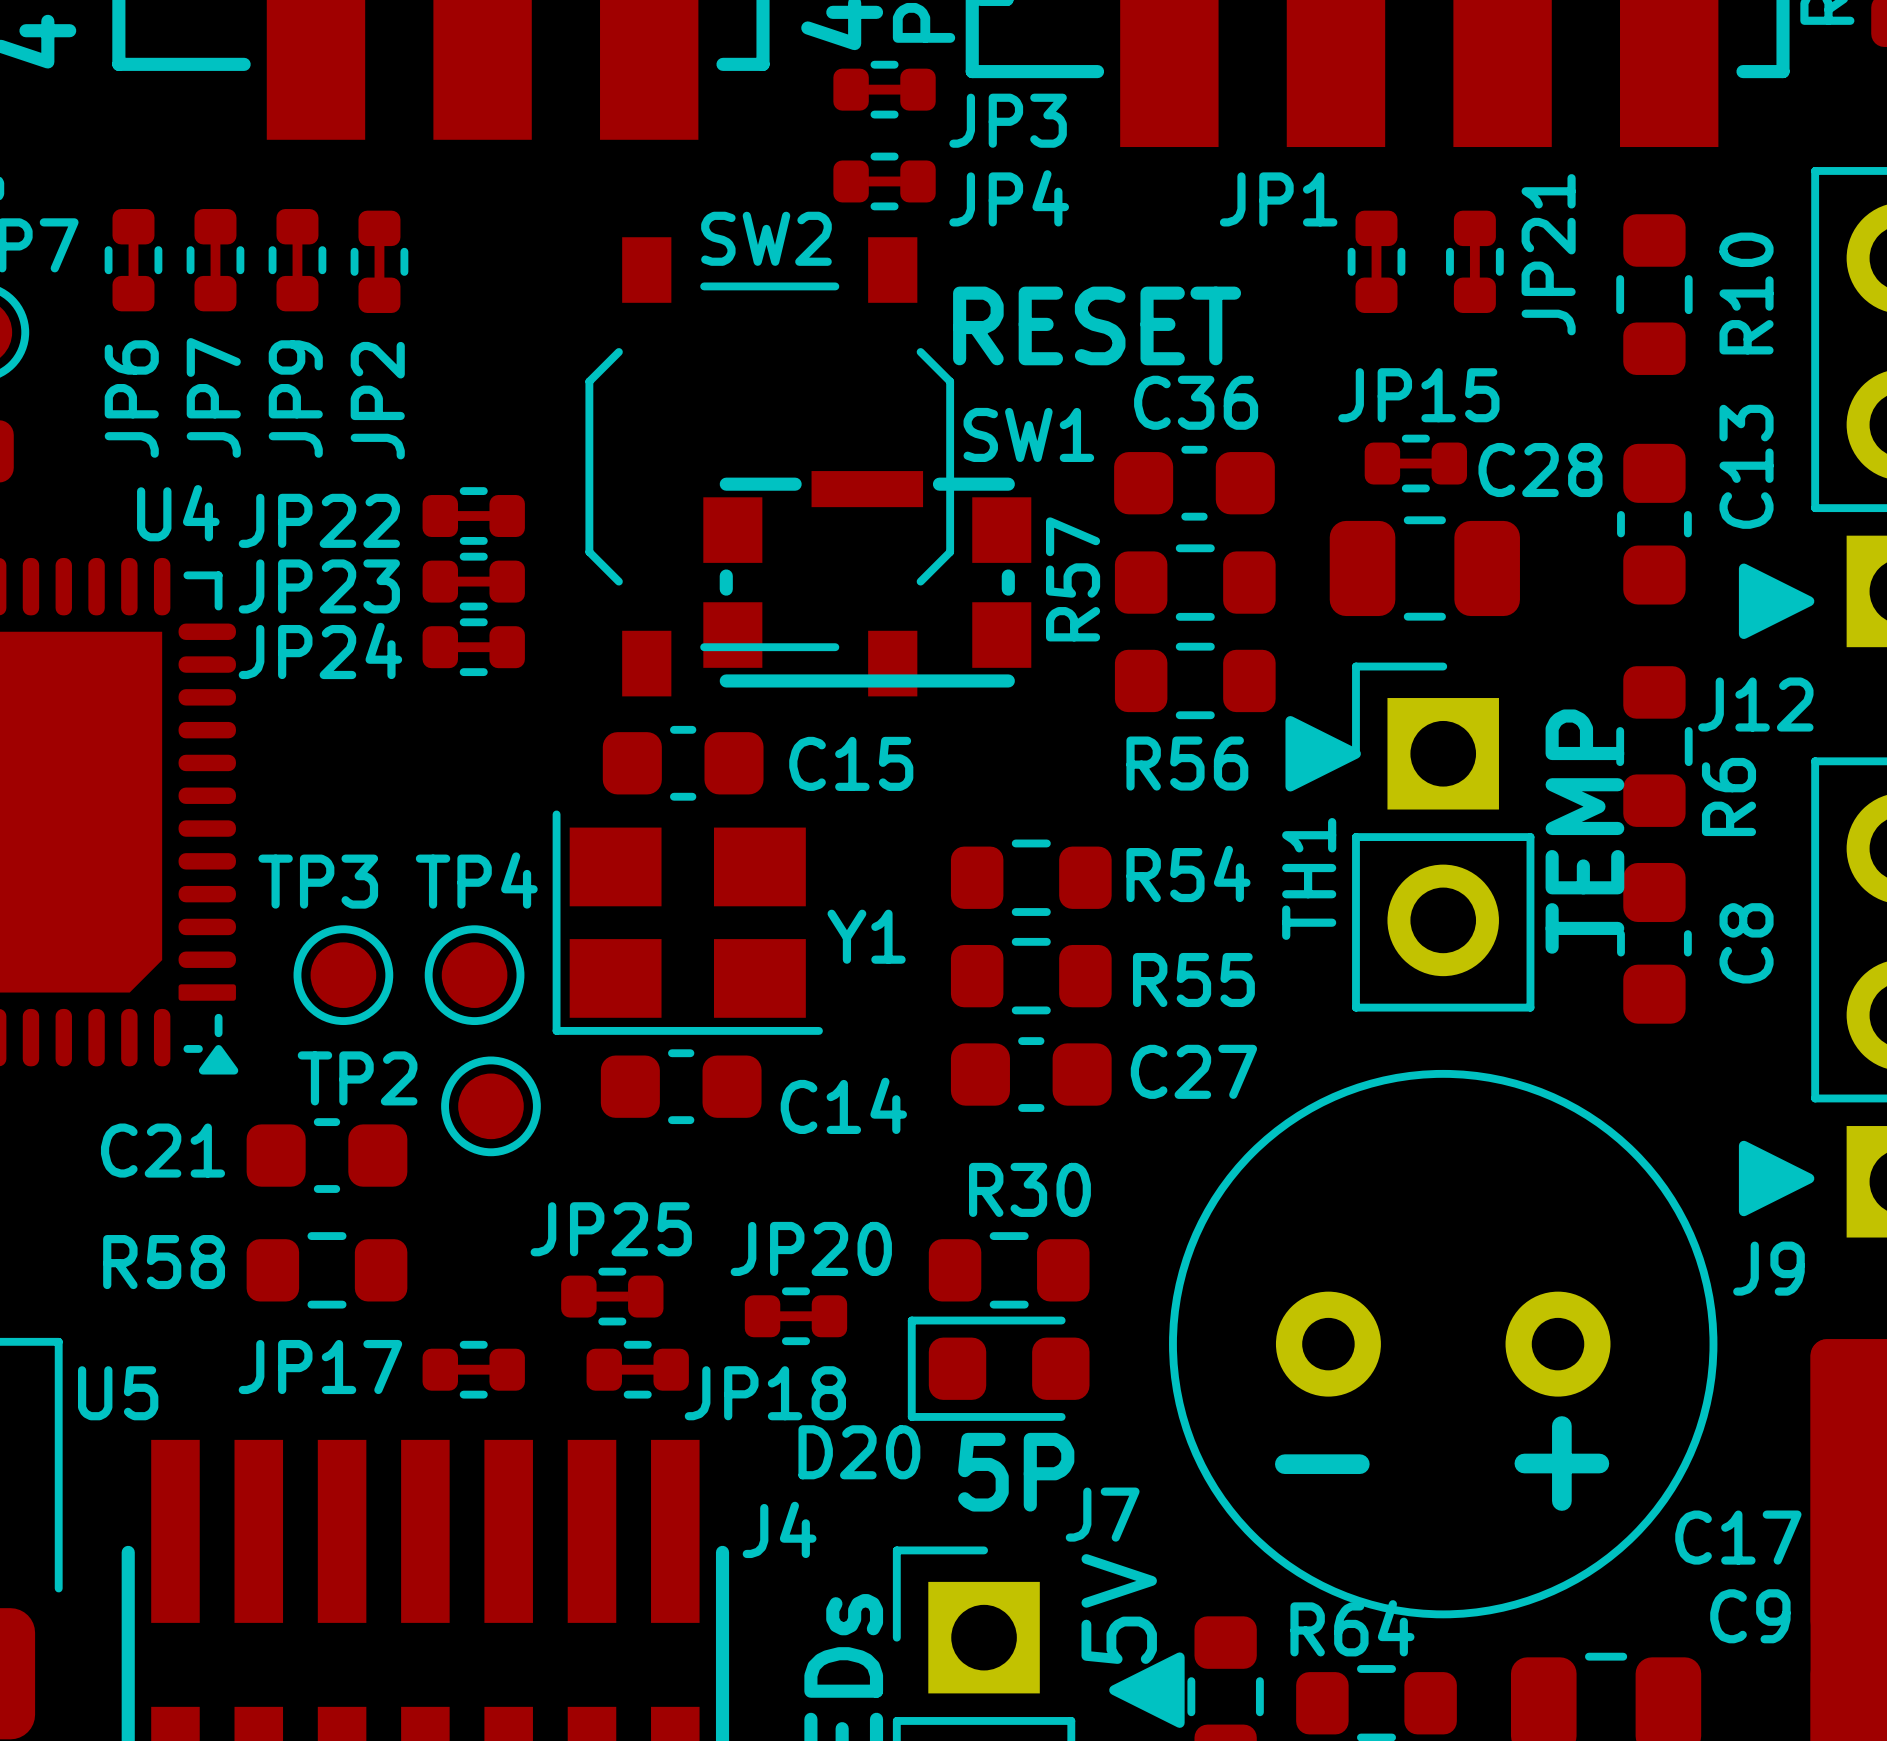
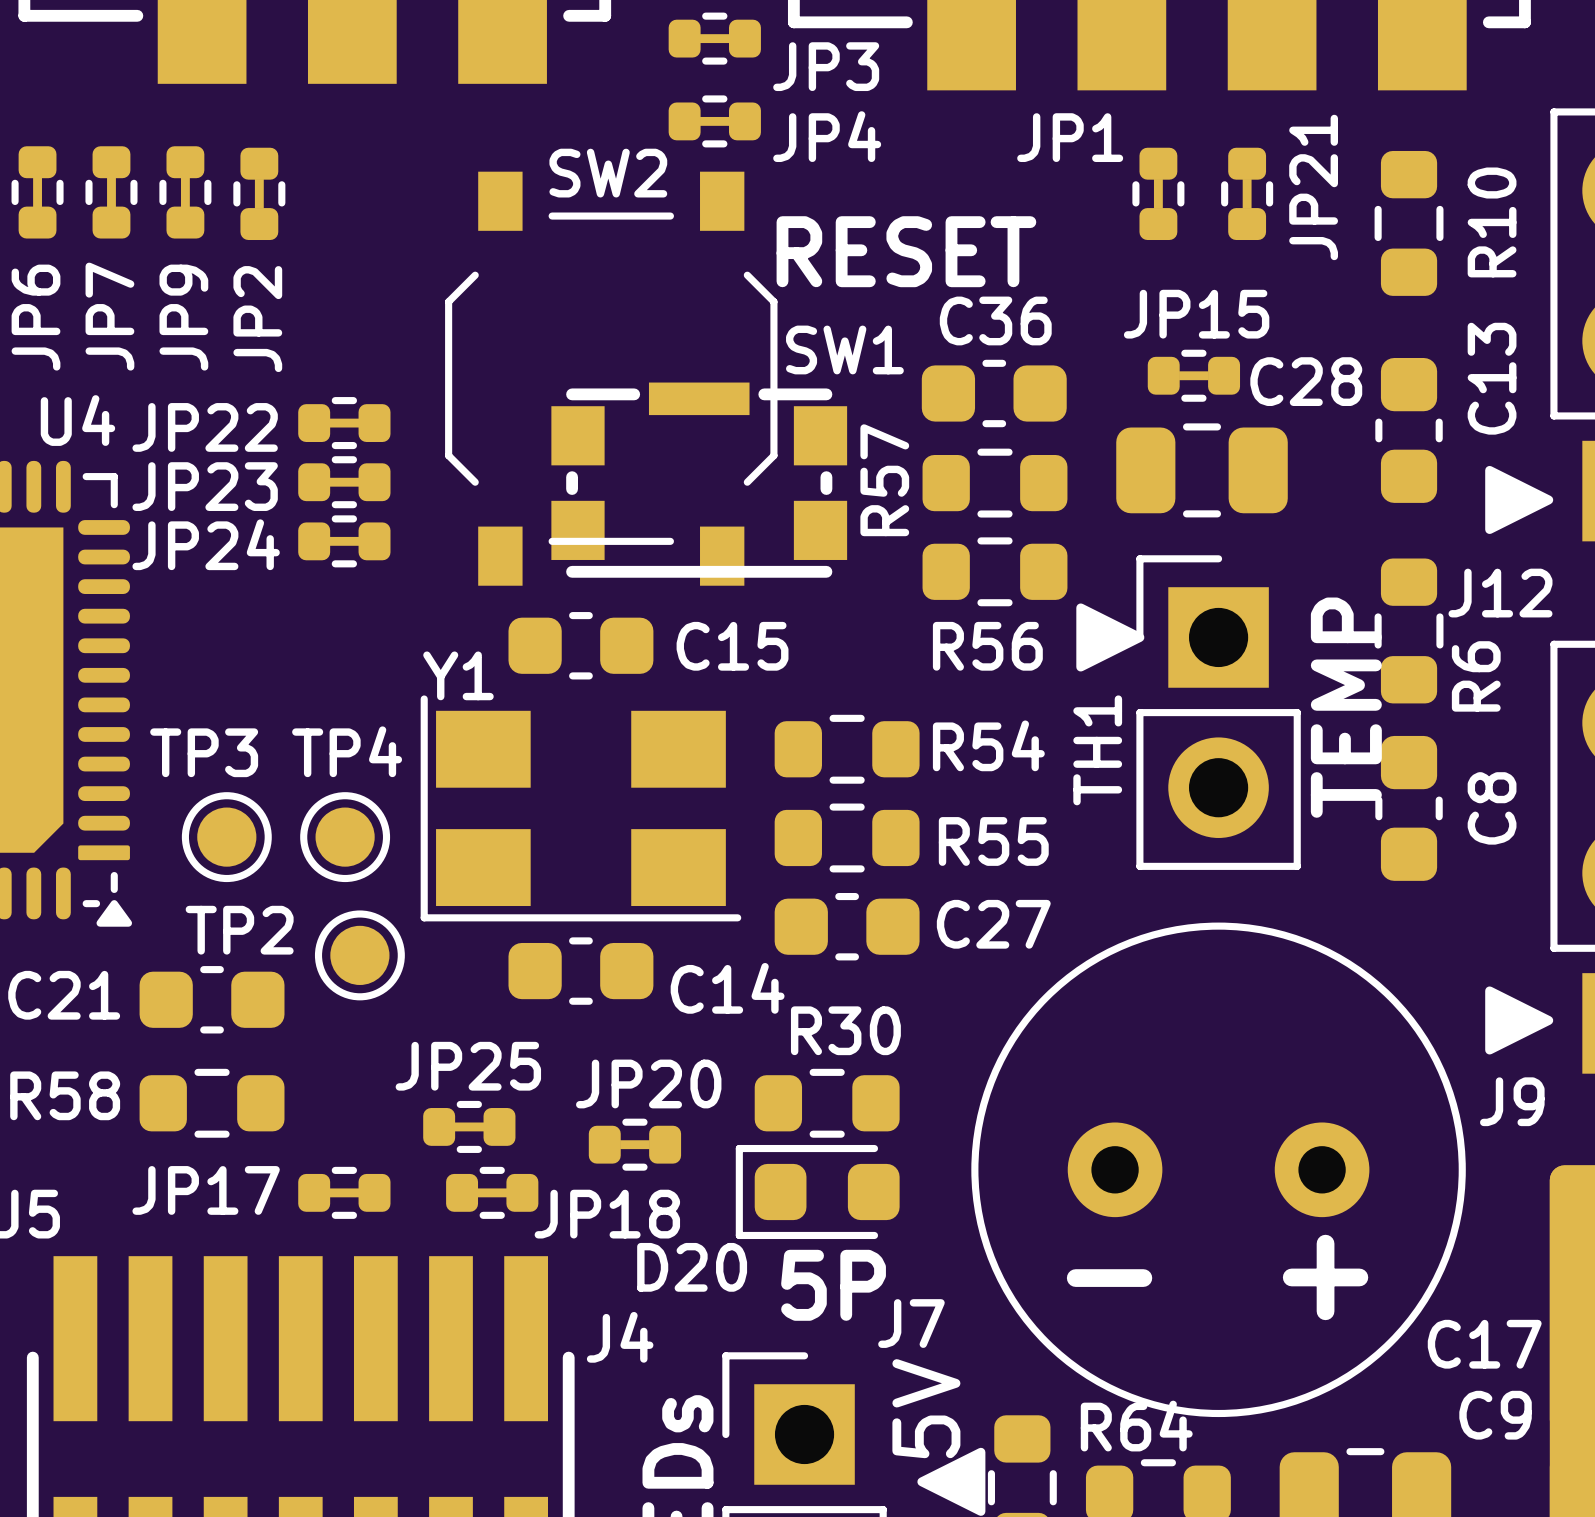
C15 position: (683, 763) -> (580, 645)
Y1 footprint: [552, 810, 823, 1035] -> [420, 695, 742, 922]
Y1 name position: Y1 (866, 936) -> Y1 (458, 675)
C14 position: (681, 1086) -> (580, 971)

